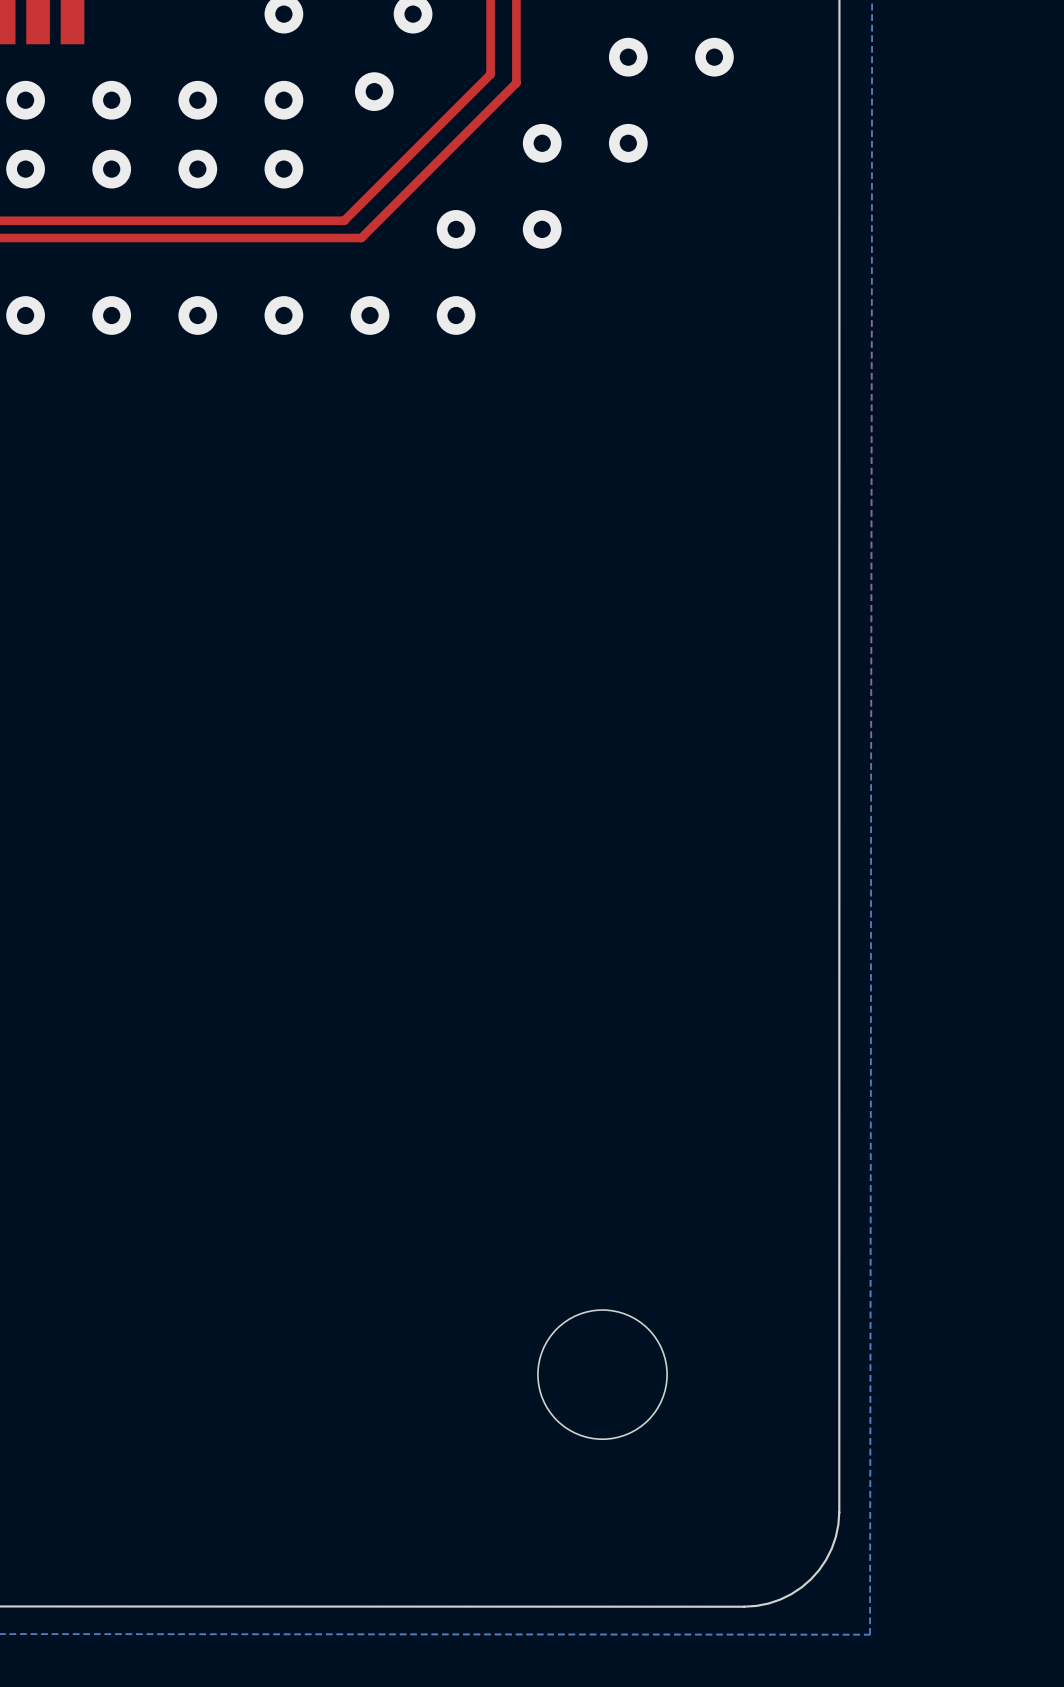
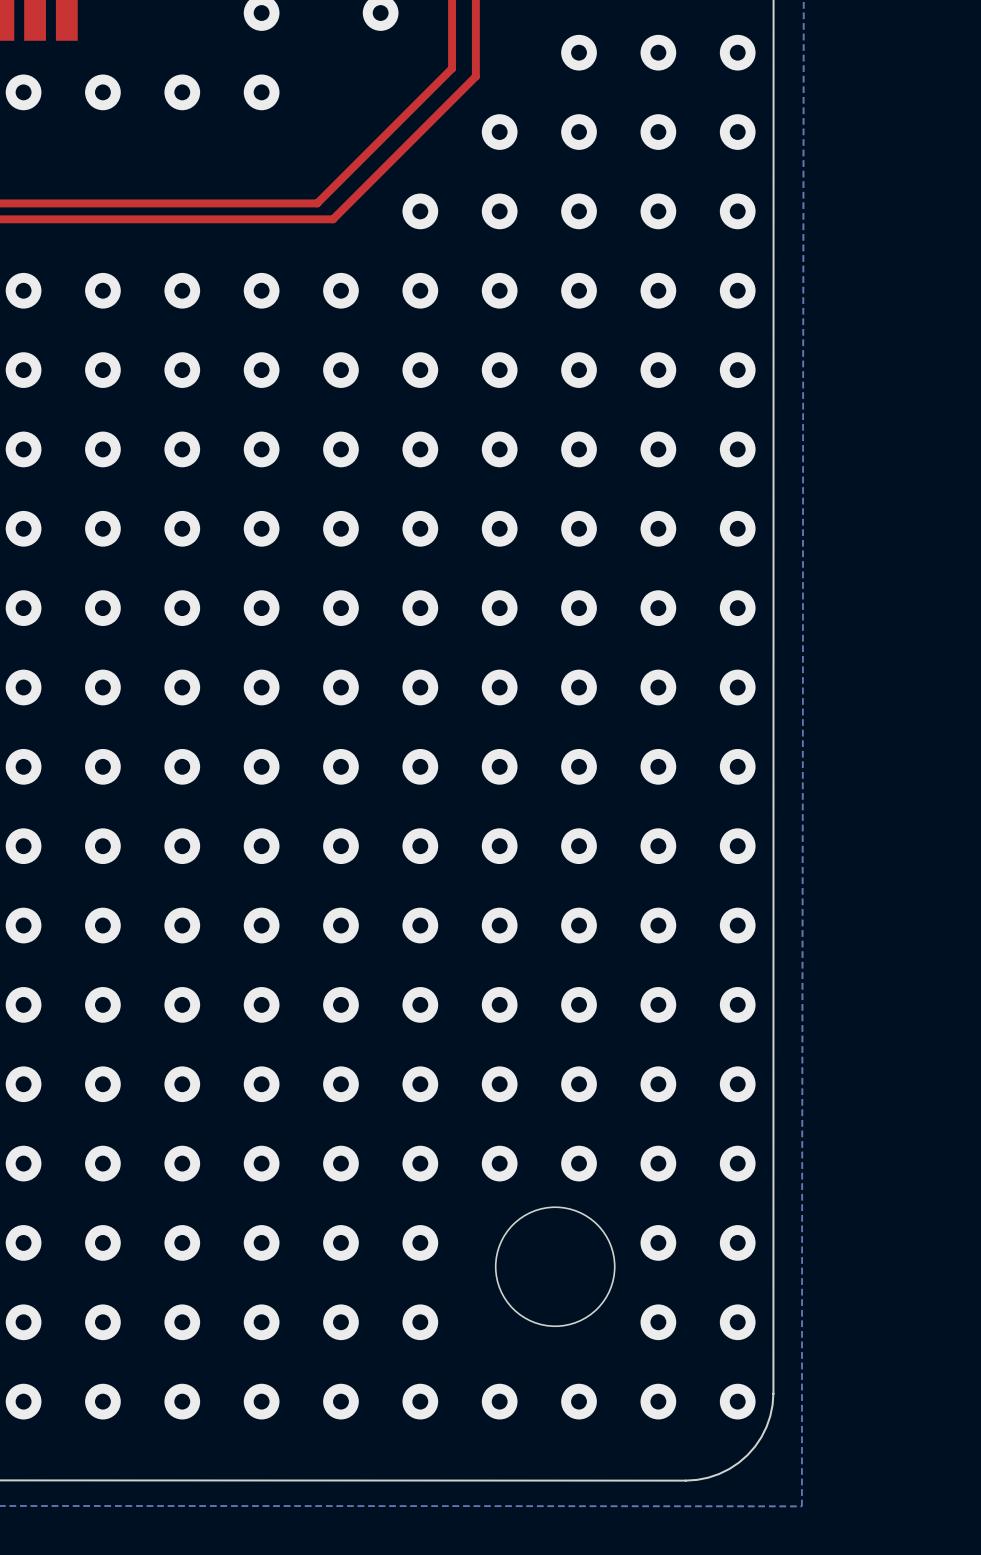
via: none -> (737, 52)
via: (374, 91) -> none
via: none -> (658, 132)
via: none -> (737, 132)
via: (25, 169) -> none
via: (111, 169) -> none
via: (197, 169) -> none
via: (283, 169) -> none
via: none -> (579, 211)
via: none -> (658, 211)
via: none -> (737, 211)
via: none -> (499, 290)
via: none -> (579, 290)
via: none -> (658, 290)
via: none -> (737, 290)
via: none -> (23, 370)
via: none -> (102, 370)
via: none -> (182, 370)
via: none -> (261, 370)
via: none -> (340, 370)
via: none -> (420, 370)
via: none -> (499, 370)
via: none -> (579, 370)
via: none -> (658, 370)
via: none -> (737, 370)
via: none -> (23, 449)
via: none -> (102, 449)
via: none -> (182, 449)
via: none -> (261, 449)
via: none -> (340, 449)
via: none -> (420, 449)
via: none -> (499, 449)
via: none -> (579, 449)
via: none -> (658, 449)
via: none -> (737, 449)
via: none -> (23, 528)
via: none -> (102, 528)
via: none -> (182, 528)
via: none -> (261, 528)
via: none -> (340, 528)
via: none -> (420, 528)
via: none -> (499, 528)
via: none -> (579, 528)
via: none -> (658, 528)
via: none -> (737, 528)
via: none -> (23, 608)
via: none -> (102, 608)
via: none -> (182, 608)
via: none -> (261, 608)
via: none -> (340, 608)
via: none -> (420, 608)
via: none -> (499, 608)
via: none -> (579, 608)
via: none -> (658, 608)
via: none -> (737, 608)
via: none -> (23, 687)
via: none -> (102, 687)
via: none -> (182, 687)
via: none -> (261, 687)
via: none -> (340, 687)
via: none -> (420, 687)
via: none -> (499, 687)
via: none -> (579, 687)
via: none -> (658, 687)
via: none -> (737, 687)
via: none -> (23, 766)
via: none -> (102, 766)
via: none -> (182, 766)
via: none -> (261, 766)
via: none -> (340, 766)
via: none -> (420, 766)
via: none -> (499, 766)
via: none -> (579, 766)
via: none -> (658, 766)
via: none -> (737, 766)
via: none -> (23, 846)
via: none -> (102, 846)
via: none -> (182, 846)
via: none -> (261, 846)
via: none -> (340, 846)
via: none -> (420, 846)
via: none -> (499, 846)
via: none -> (579, 846)
via: none -> (658, 846)
via: none -> (737, 846)
via: none -> (23, 925)
via: none -> (102, 925)
via: none -> (182, 925)
via: none -> (261, 925)
via: none -> (340, 925)
via: none -> (420, 925)
via: none -> (499, 925)
via: none -> (579, 925)
via: none -> (658, 925)
via: none -> (737, 925)
via: none -> (23, 1004)
via: none -> (102, 1004)
via: none -> (182, 1004)
via: none -> (261, 1004)
via: none -> (340, 1004)
via: none -> (420, 1004)
via: none -> (499, 1004)
via: none -> (579, 1004)
via: none -> (658, 1004)
via: none -> (737, 1004)
via: none -> (23, 1084)
via: none -> (102, 1084)
via: none -> (182, 1084)
via: none -> (261, 1084)
via: none -> (340, 1084)
via: none -> (420, 1084)
via: none -> (499, 1084)
via: none -> (579, 1084)
via: none -> (658, 1084)
via: none -> (737, 1084)
via: none -> (23, 1163)
via: none -> (102, 1163)
via: none -> (182, 1163)
via: none -> (261, 1163)
via: none -> (340, 1163)
via: none -> (420, 1163)
via: none -> (499, 1163)
via: none -> (579, 1163)
via: none -> (658, 1163)
via: none -> (737, 1163)
via: none -> (23, 1242)
via: none -> (102, 1242)
via: none -> (182, 1242)
via: none -> (261, 1242)
via: none -> (340, 1242)
via: none -> (420, 1242)
via: none -> (658, 1242)
via: none -> (737, 1242)
via: none -> (23, 1322)
via: none -> (102, 1322)
via: none -> (182, 1322)
via: none -> (261, 1322)
via: none -> (340, 1322)
via: none -> (420, 1322)
via: none -> (658, 1322)
via: none -> (737, 1322)
via: none -> (23, 1401)
via: none -> (102, 1401)
via: none -> (182, 1401)
via: none -> (261, 1401)
via: none -> (340, 1401)
via: none -> (420, 1401)
via: none -> (499, 1401)
via: none -> (579, 1401)
via: none -> (658, 1401)
via: none -> (737, 1401)

